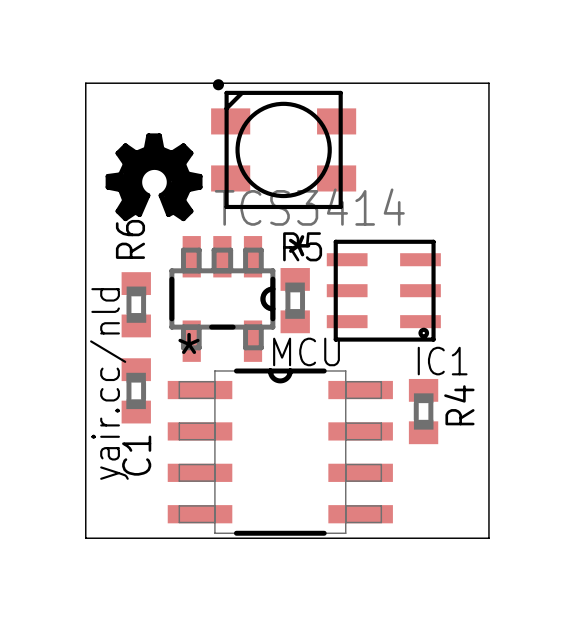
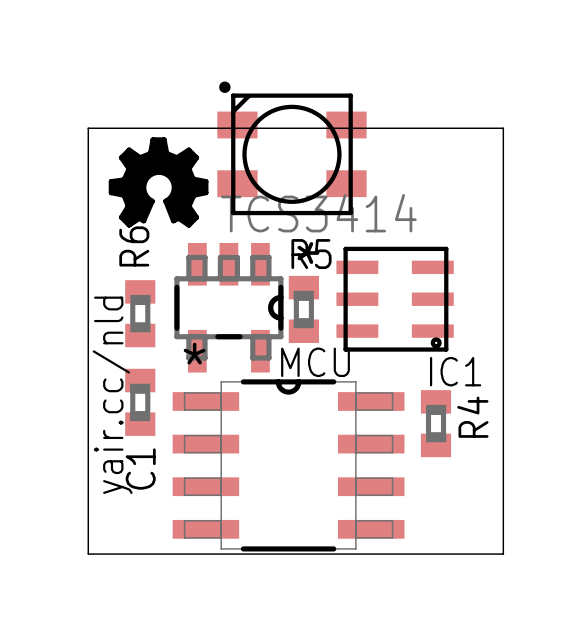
board edge: (85, 124) (85, 83) (488, 83) (488, 124) -> (88, 128) (503, 128)

